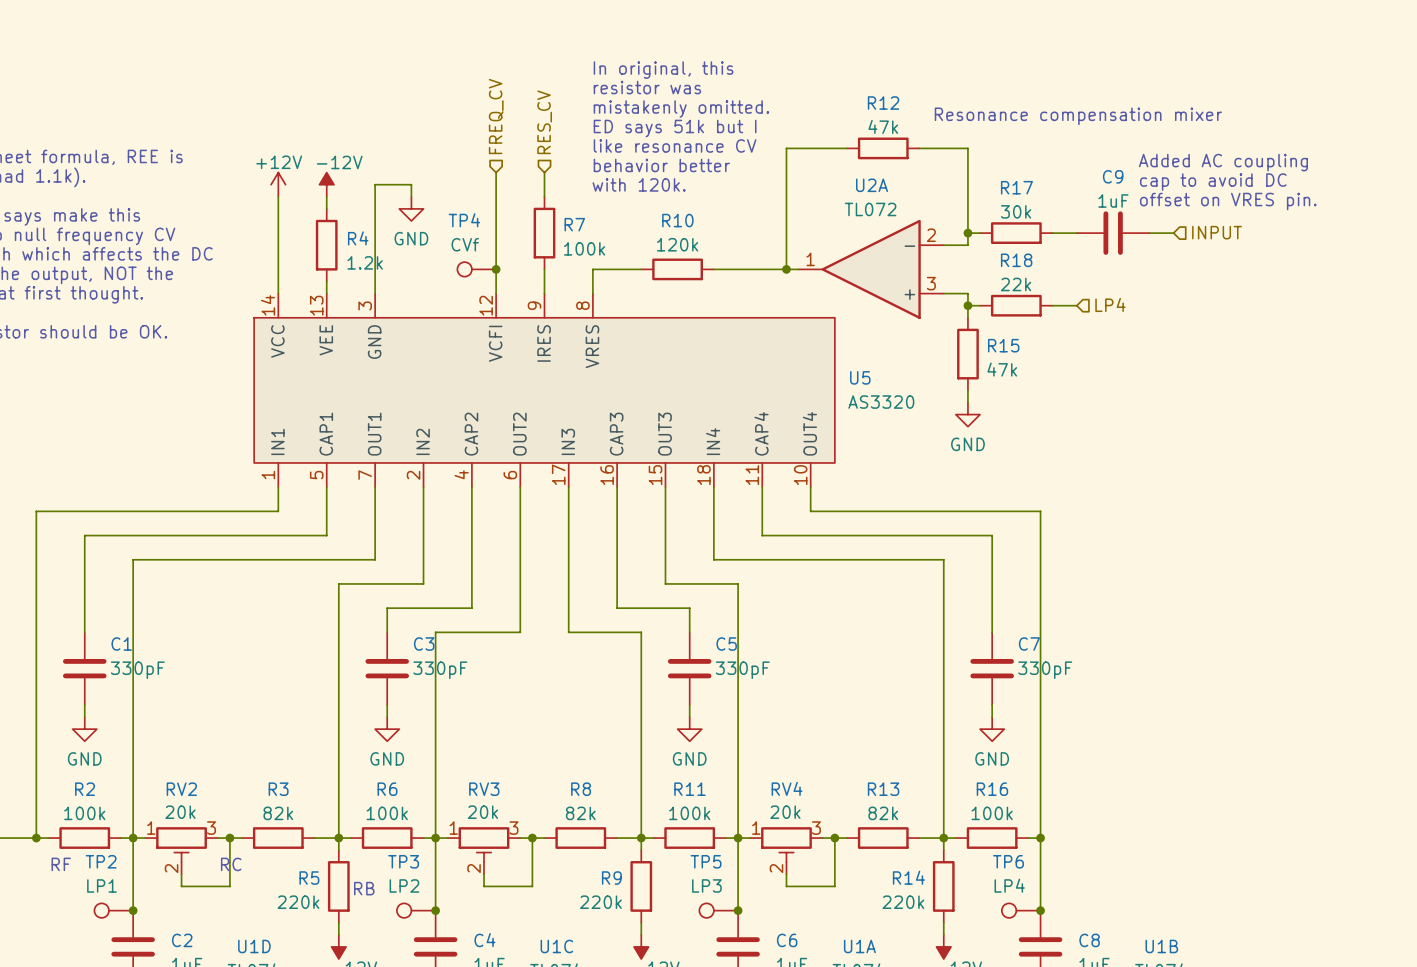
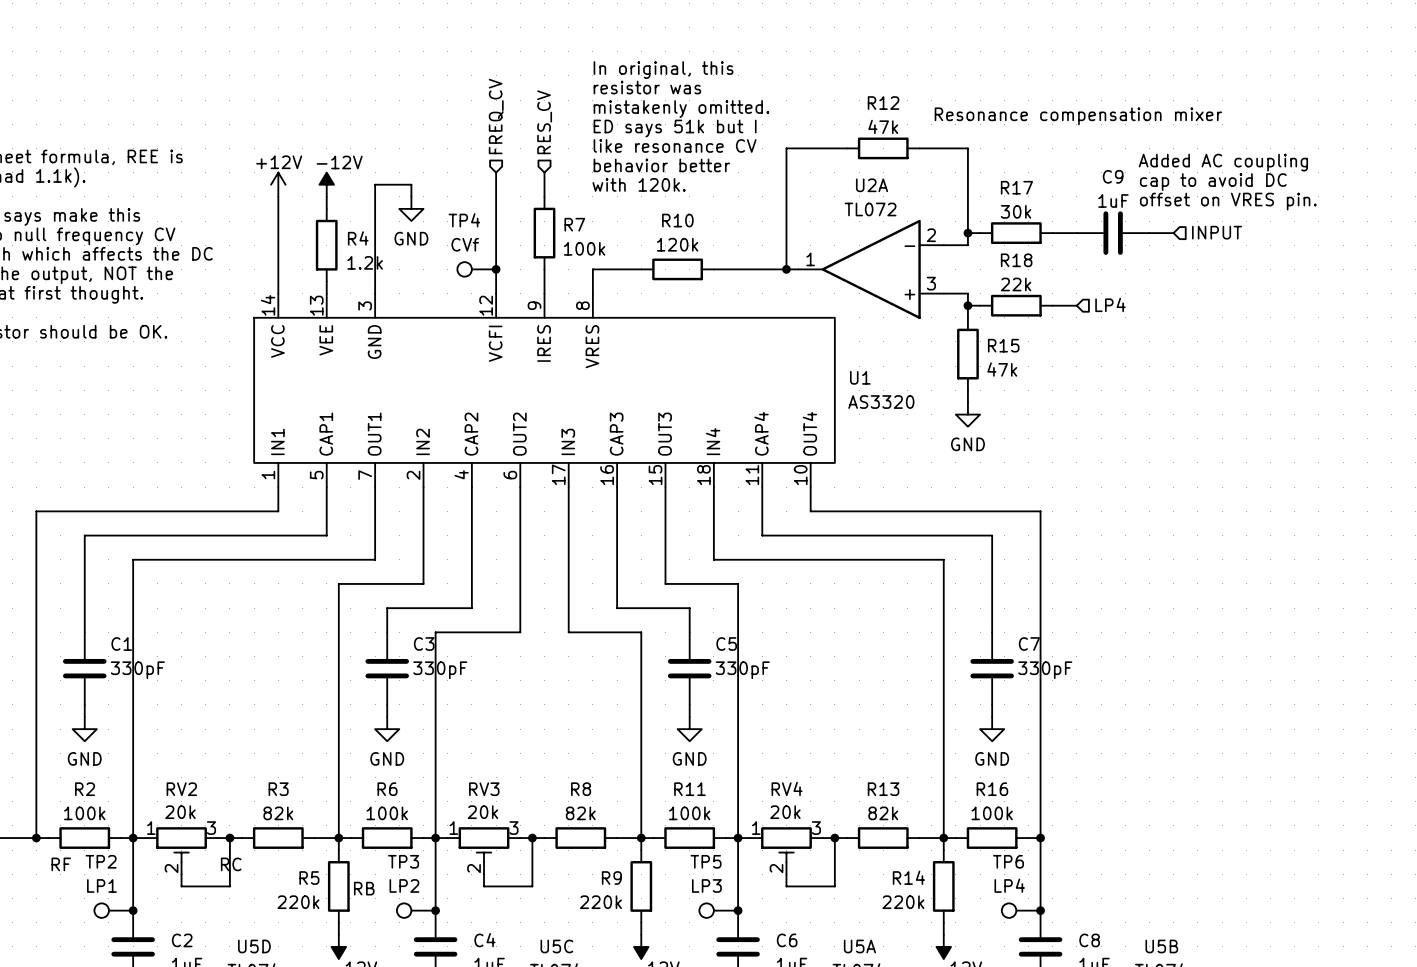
U5 name: U5 (860, 377) -> U1 (860, 377)
U1D name: U1D (254, 946) -> U5D (254, 946)
U1C name: U1C (556, 946) -> U5C (556, 946)
U1A name: U1A (859, 946) -> U5A (859, 946)
U1B name: U1B (1161, 946) -> U5B (1161, 946)

